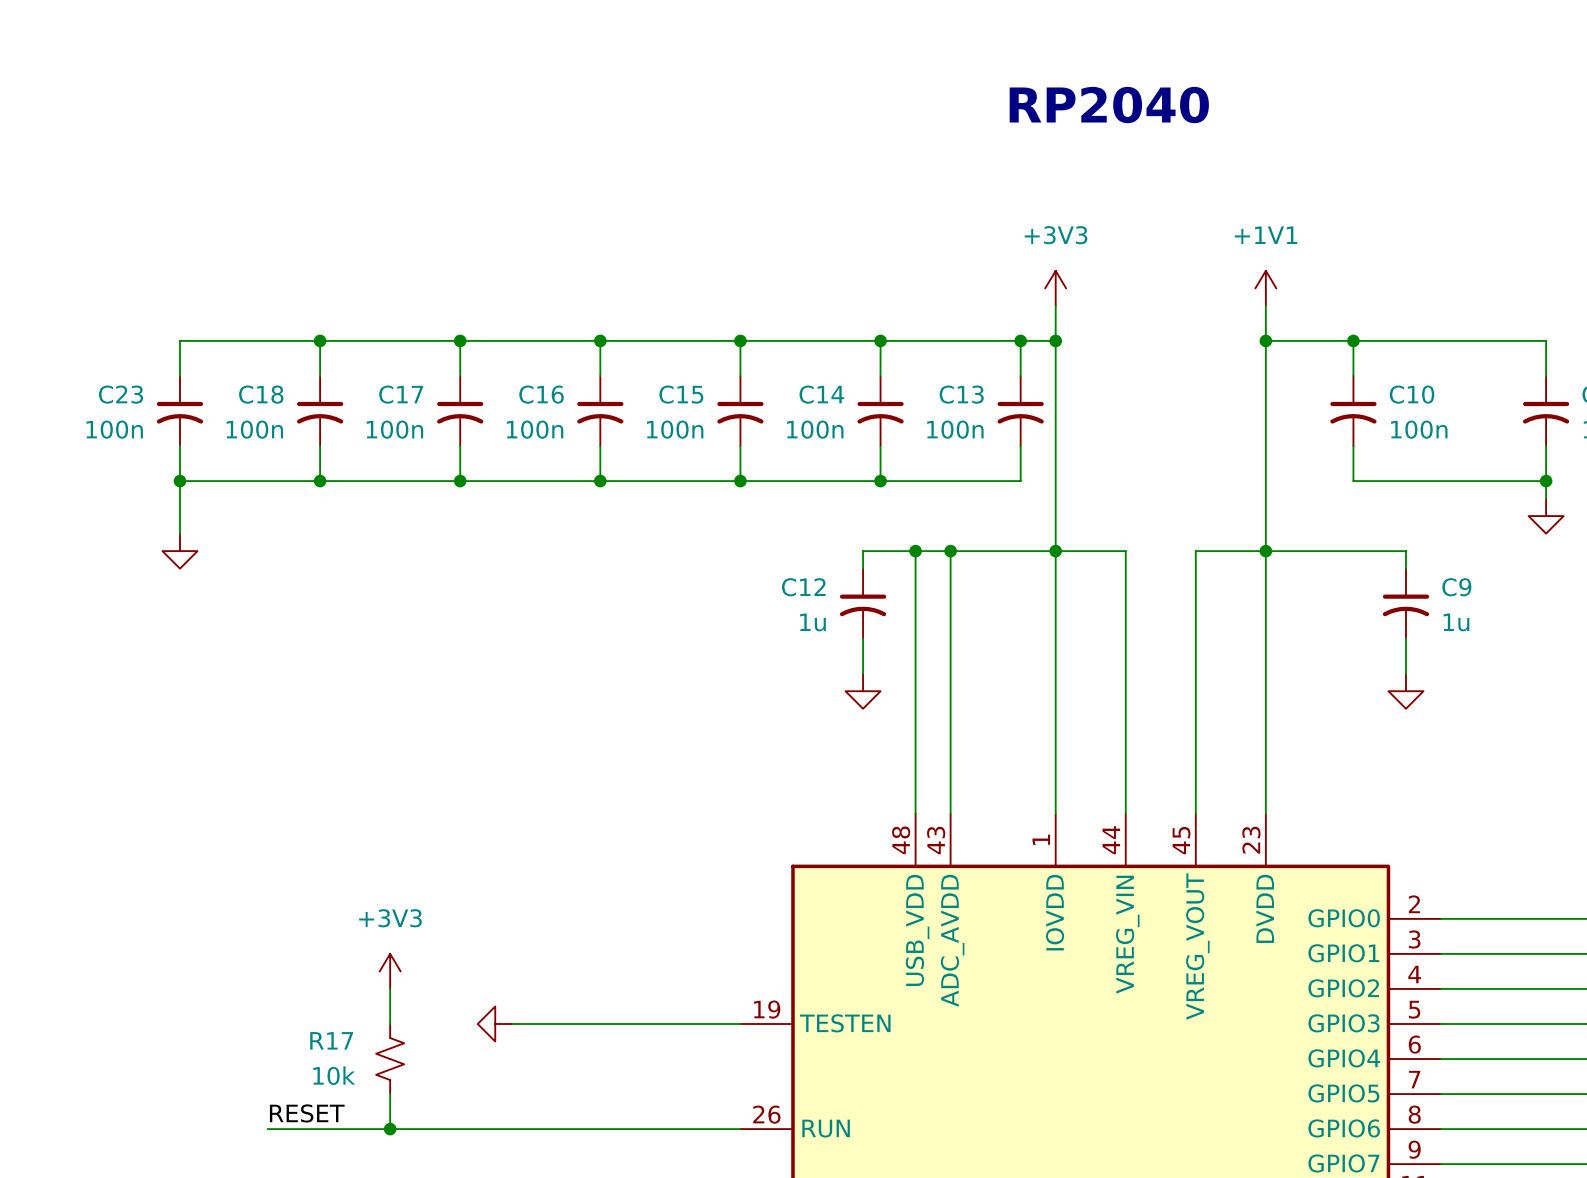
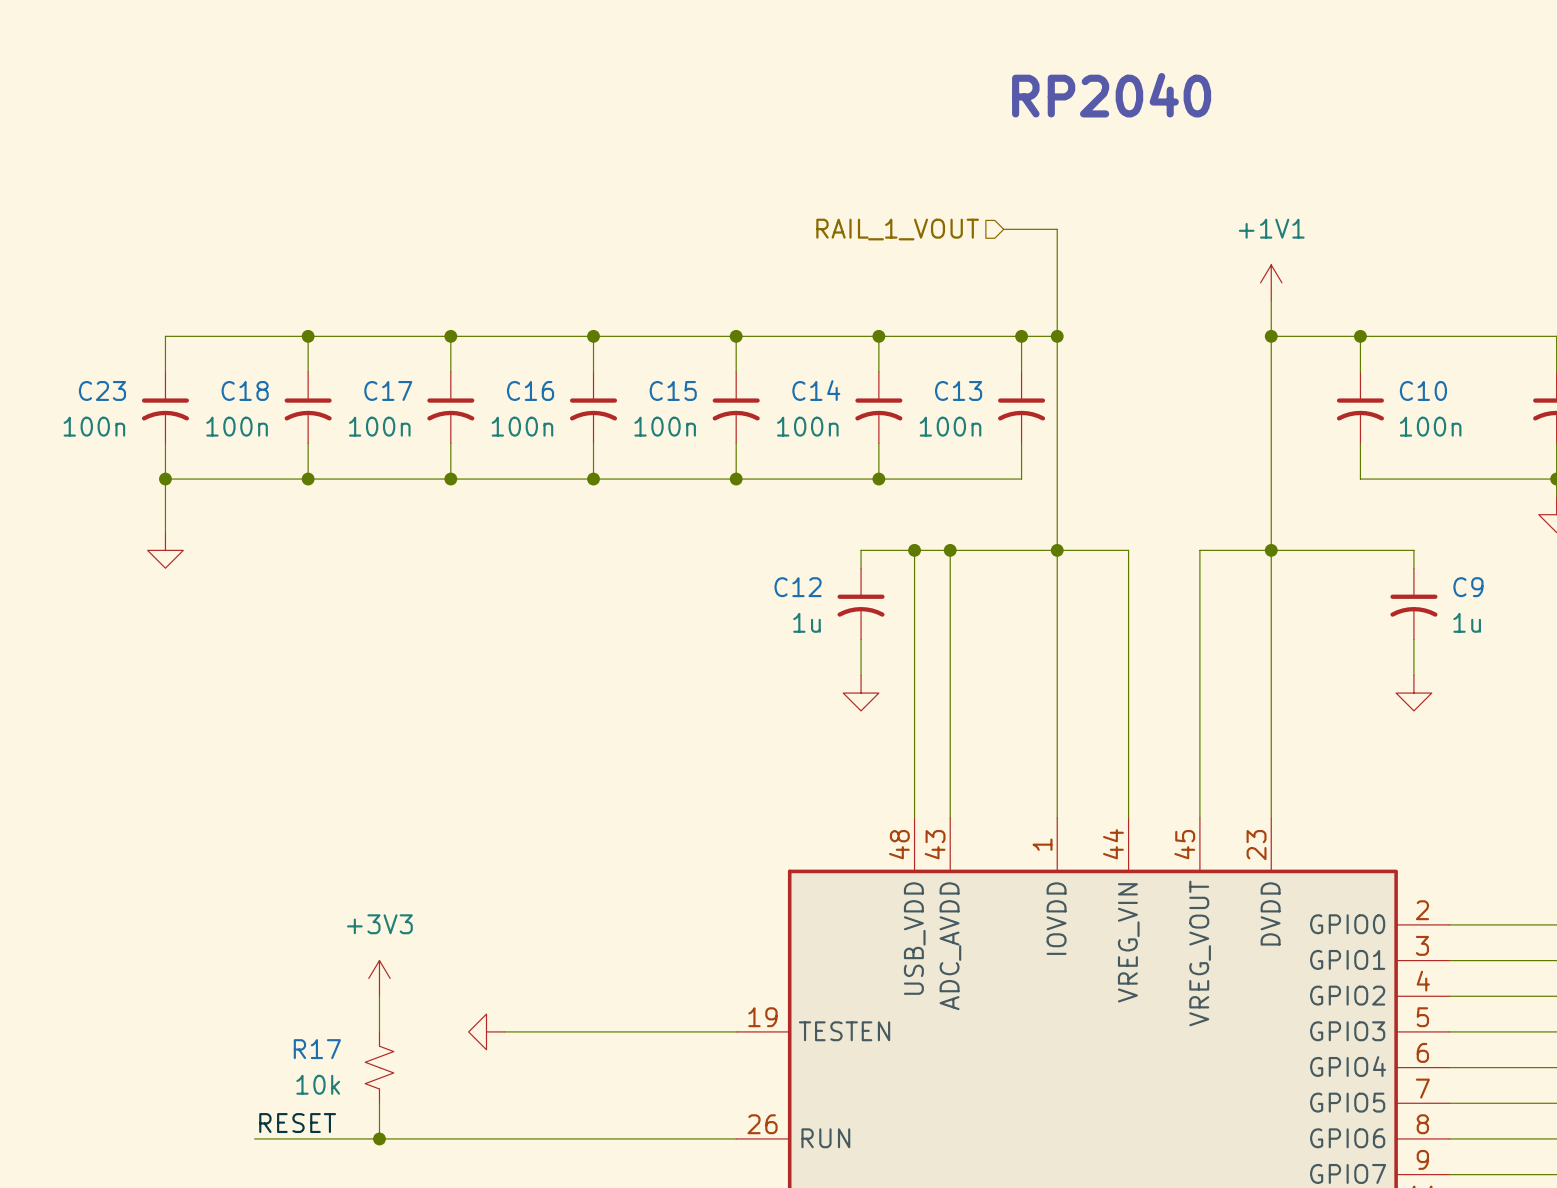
wire: none -> (1003, 229) (1057, 229) (1057, 300)
hierarchical label: none -> RAIL_1_VOUT (897, 229)
power symbol: +3V3 (1055, 288) -> none

